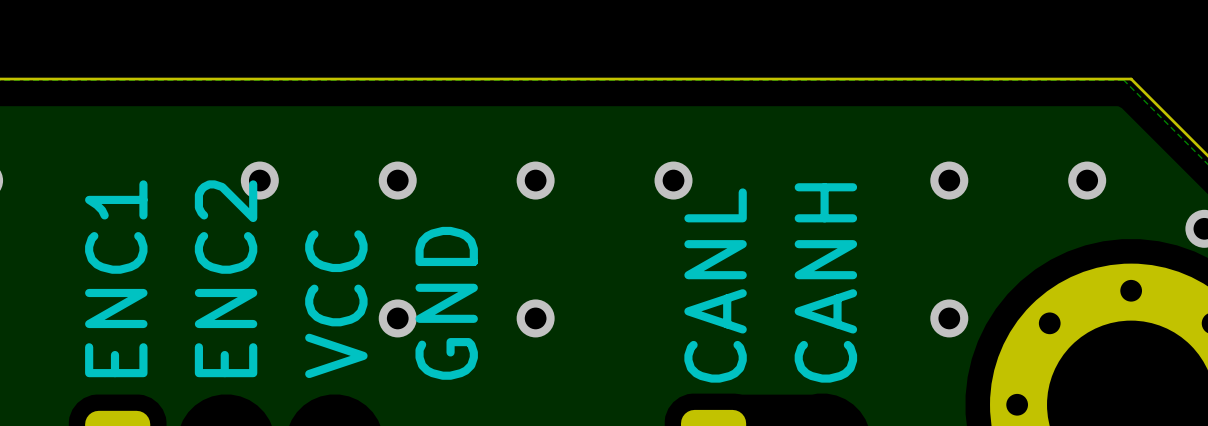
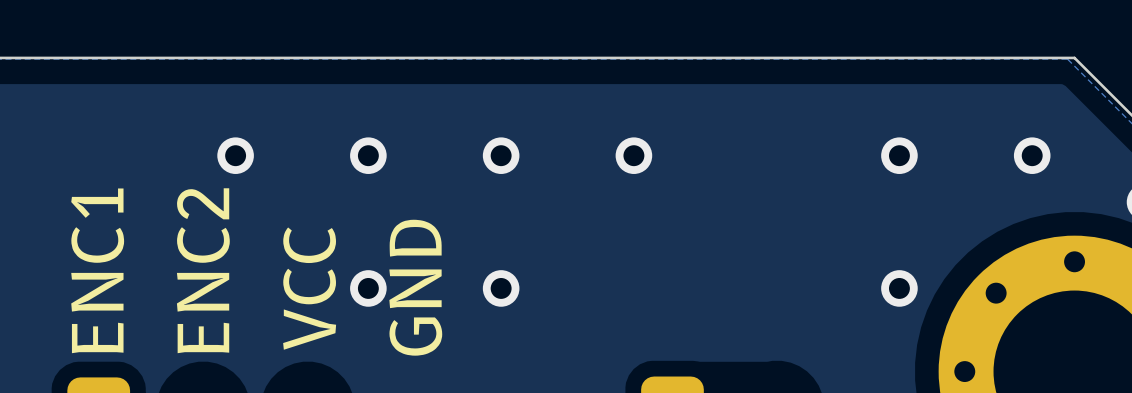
text: CANH (825, 282) -> none
text: CANL (715, 285) -> none

